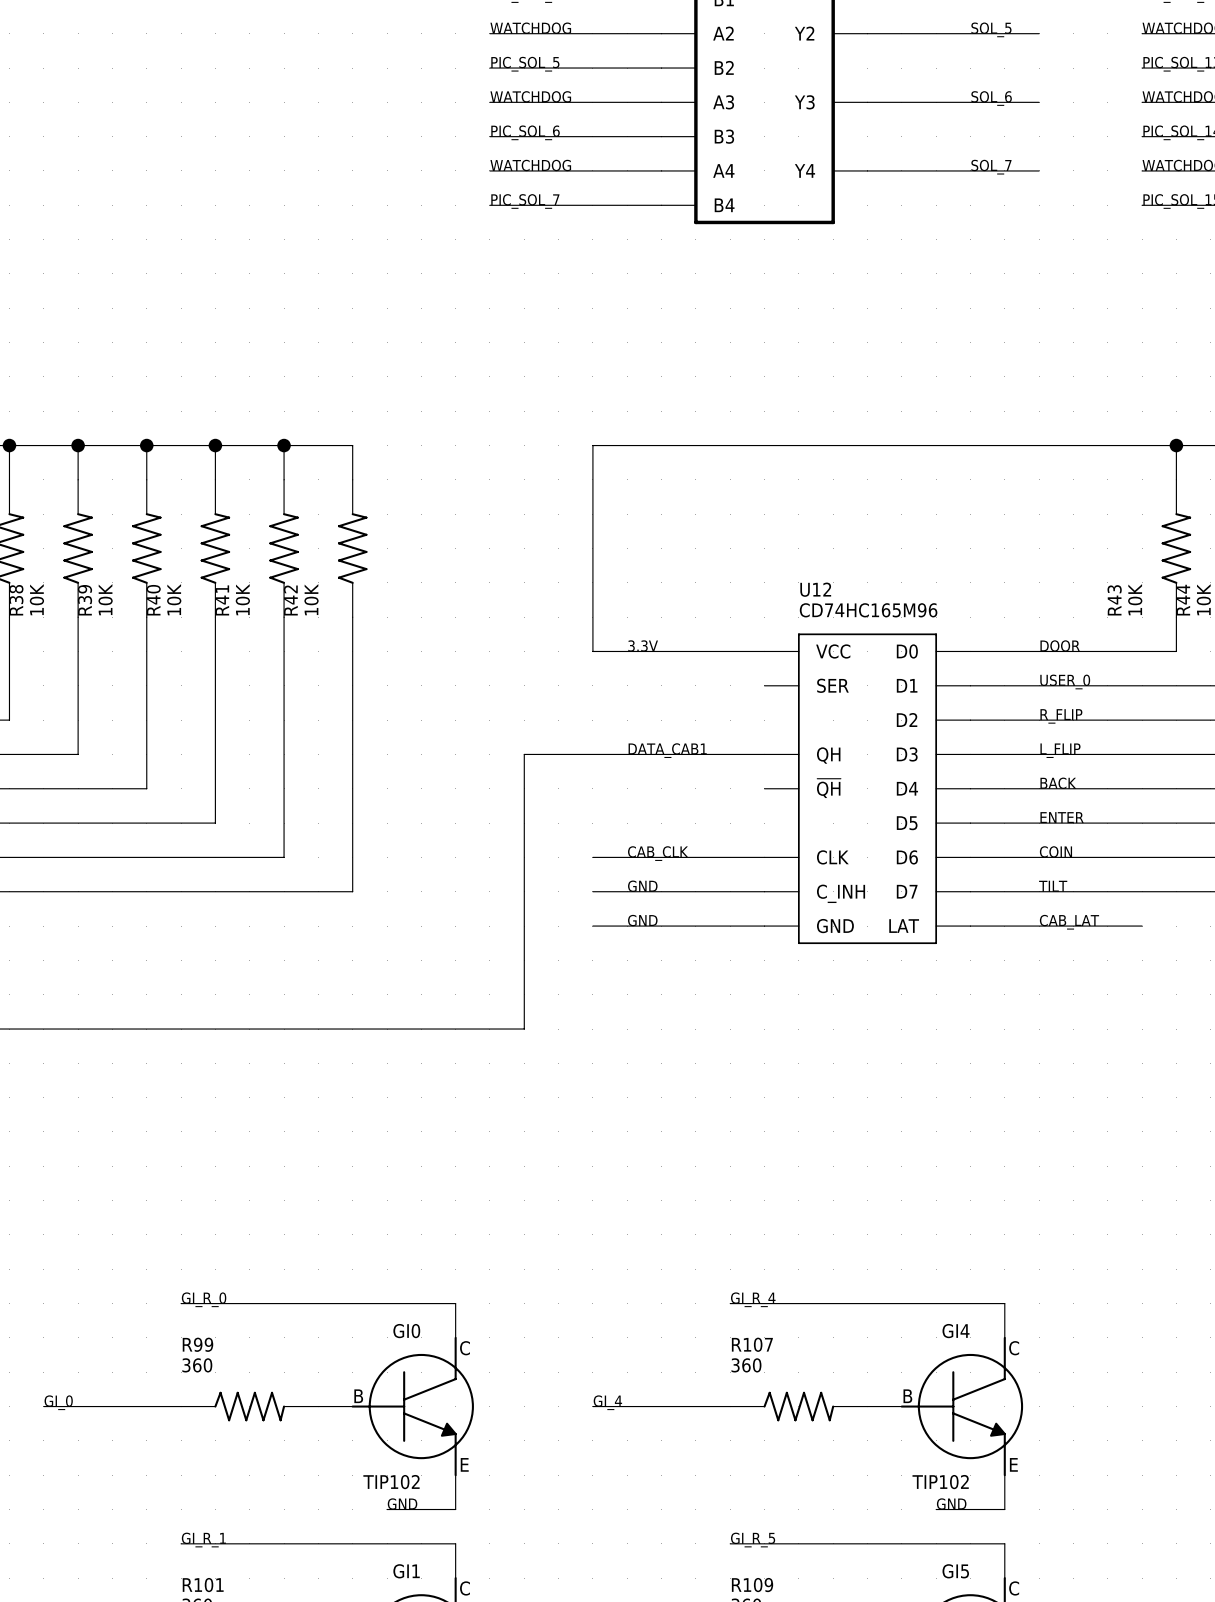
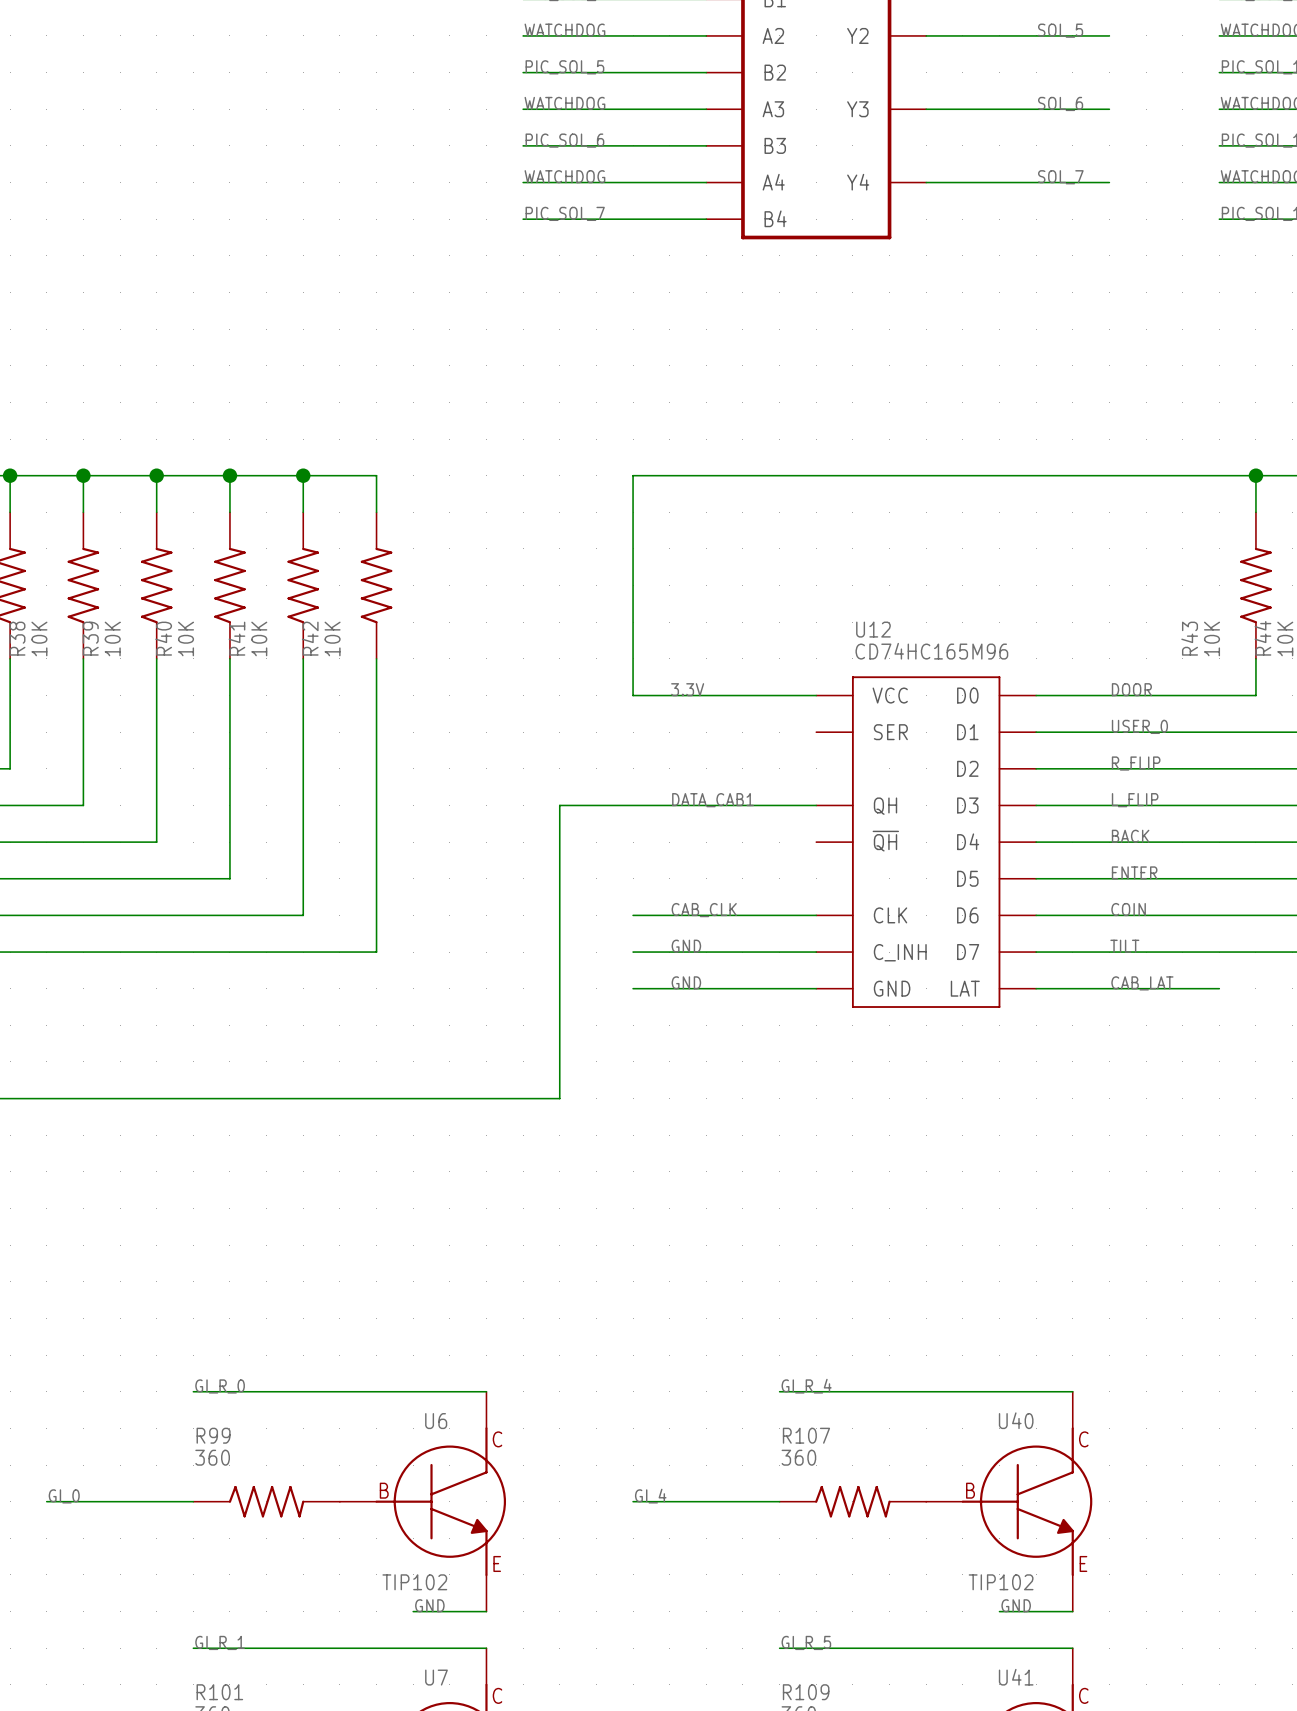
GI0 name: GI0 (406, 1331) -> U6 (436, 1421)
GI4 name: GI4 (956, 1331) -> U40 (1016, 1420)
GI1 name: GI1 (406, 1571) -> U7 (436, 1677)
GI5 name: GI5 (955, 1571) -> U41 (1016, 1677)

